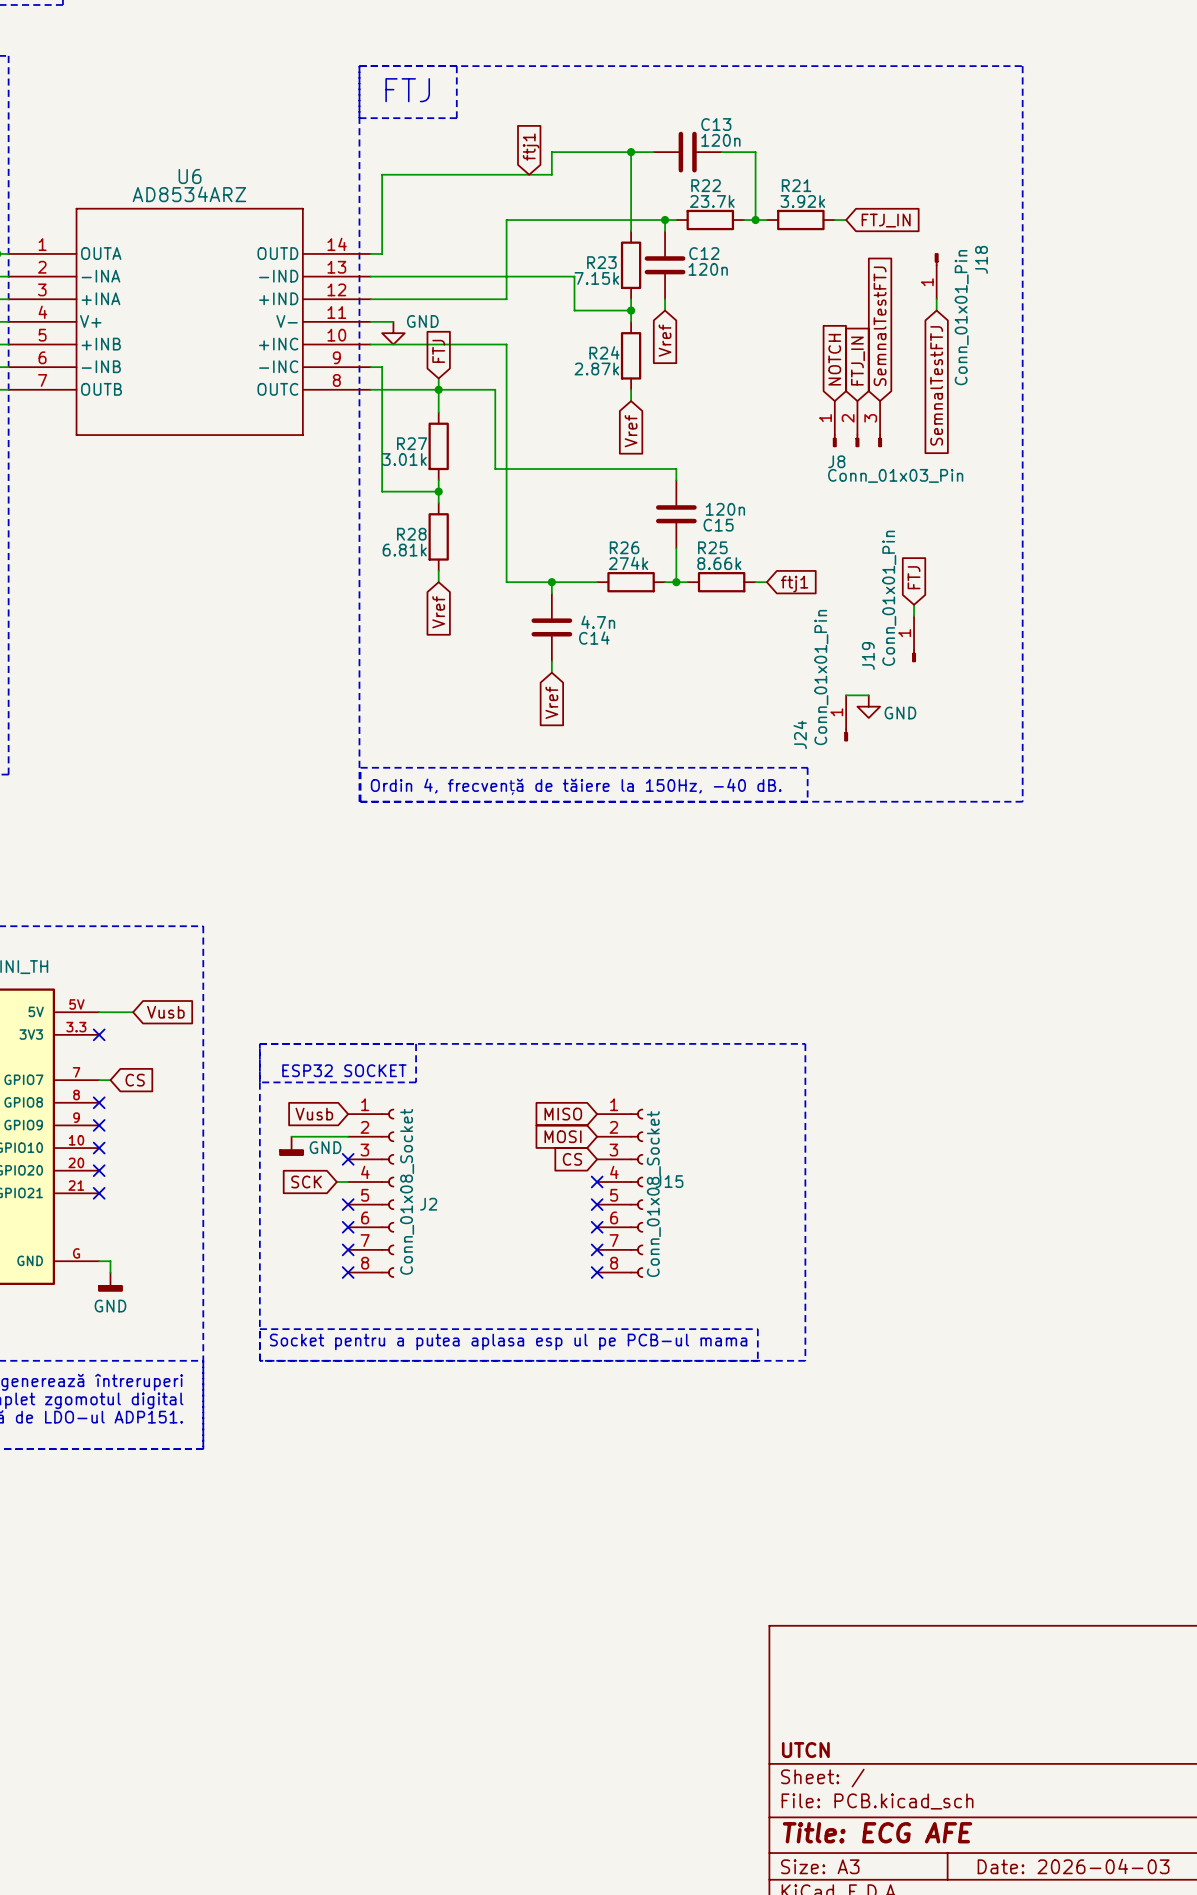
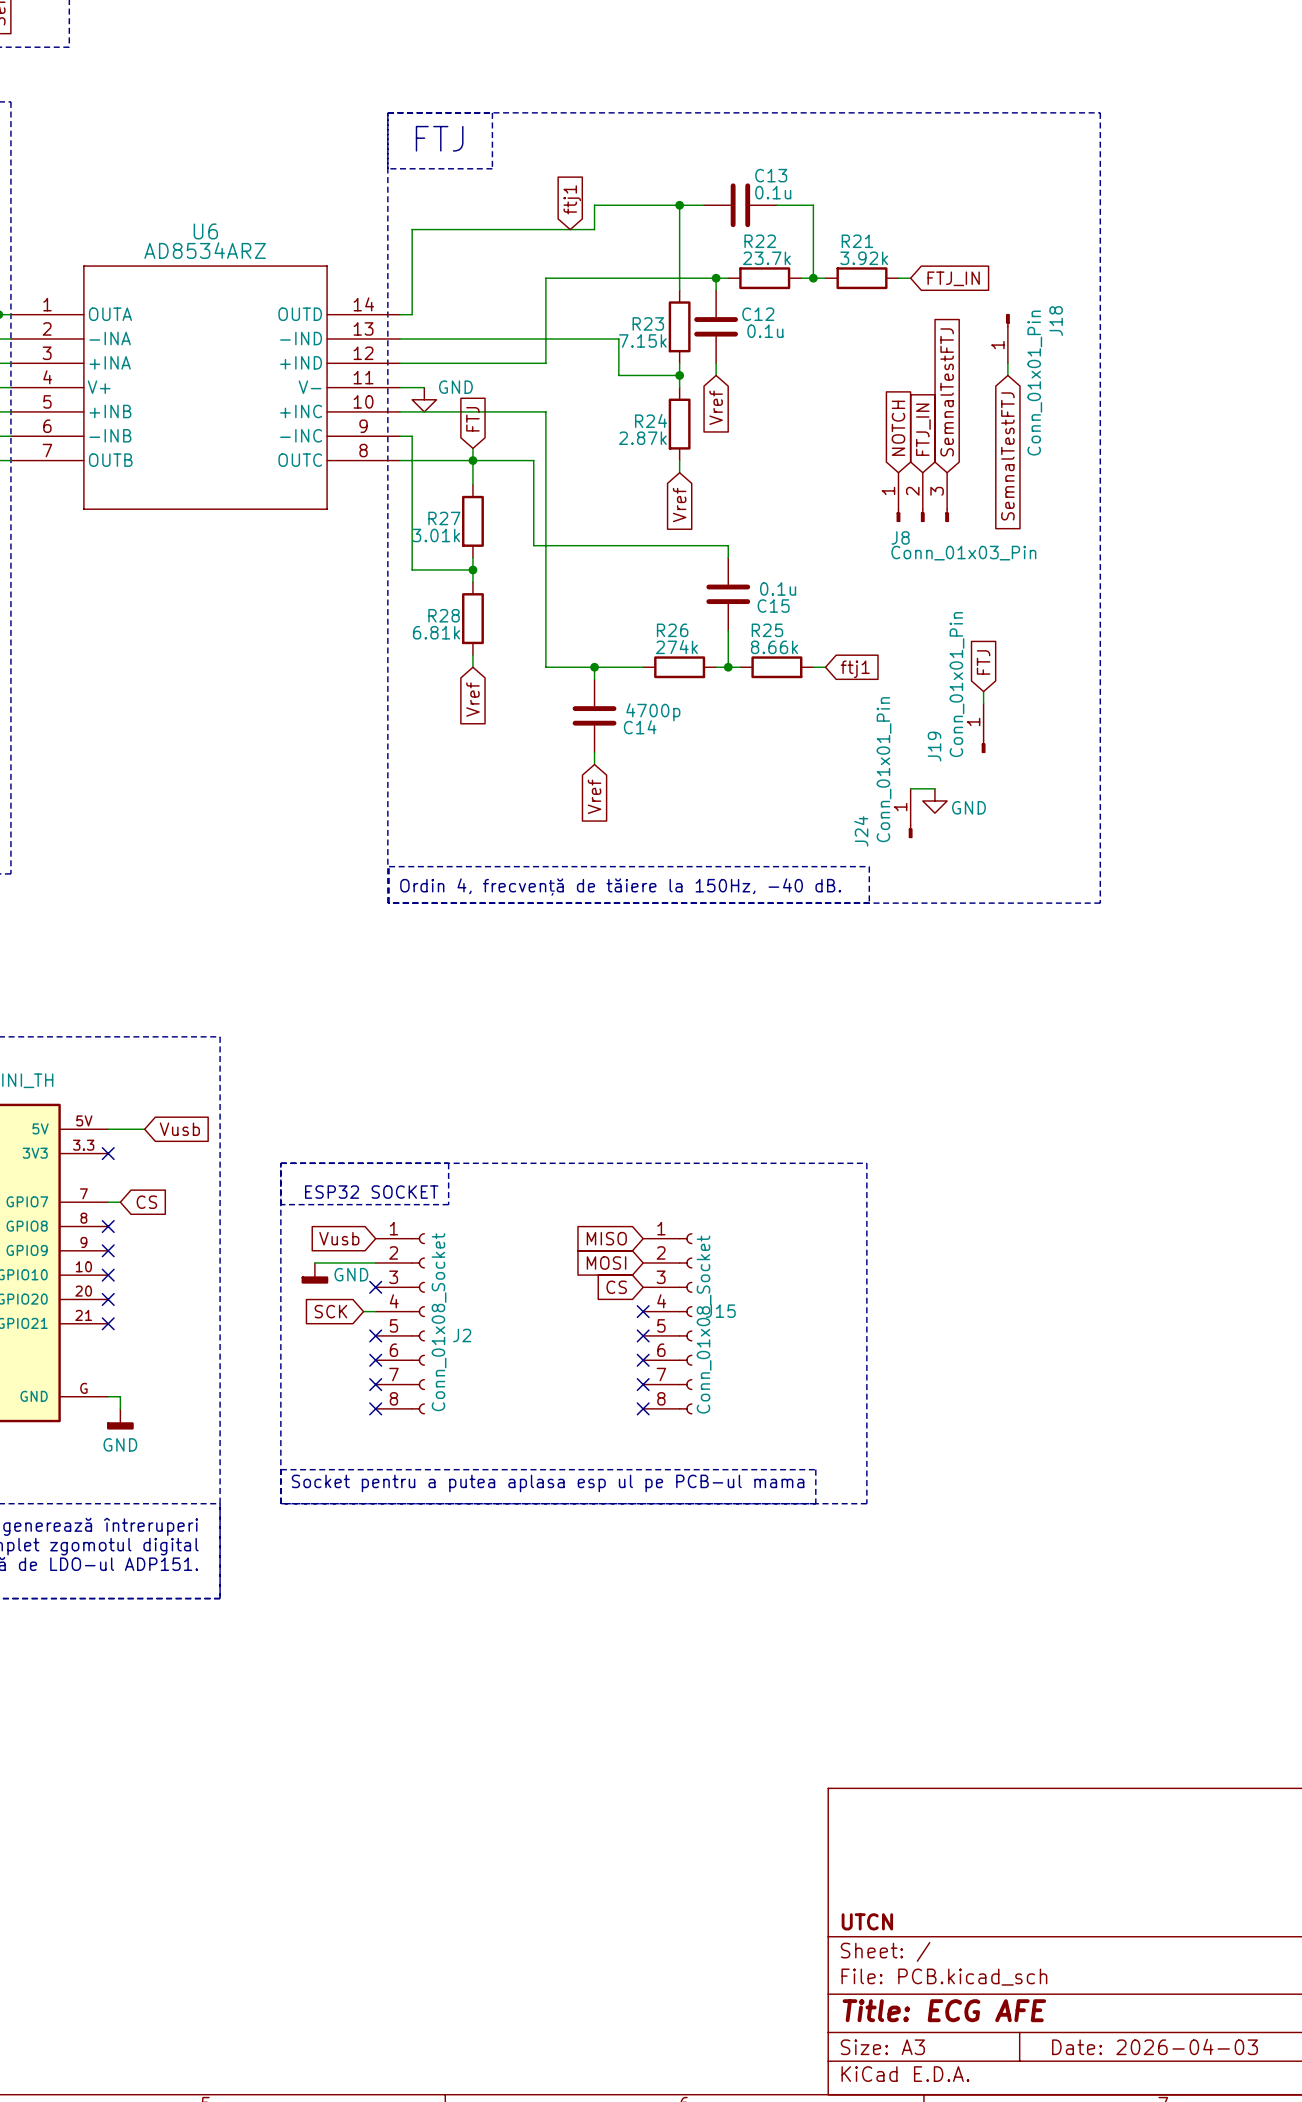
C13 value: 120n (720, 140) -> 0.1u (773, 192)
C12 value: 120n (708, 269) -> 0.1u (765, 331)
C15 value: 120n (725, 509) -> 0.1u (778, 588)
C14 value: 4.7n (598, 622) -> 4700p (653, 712)

